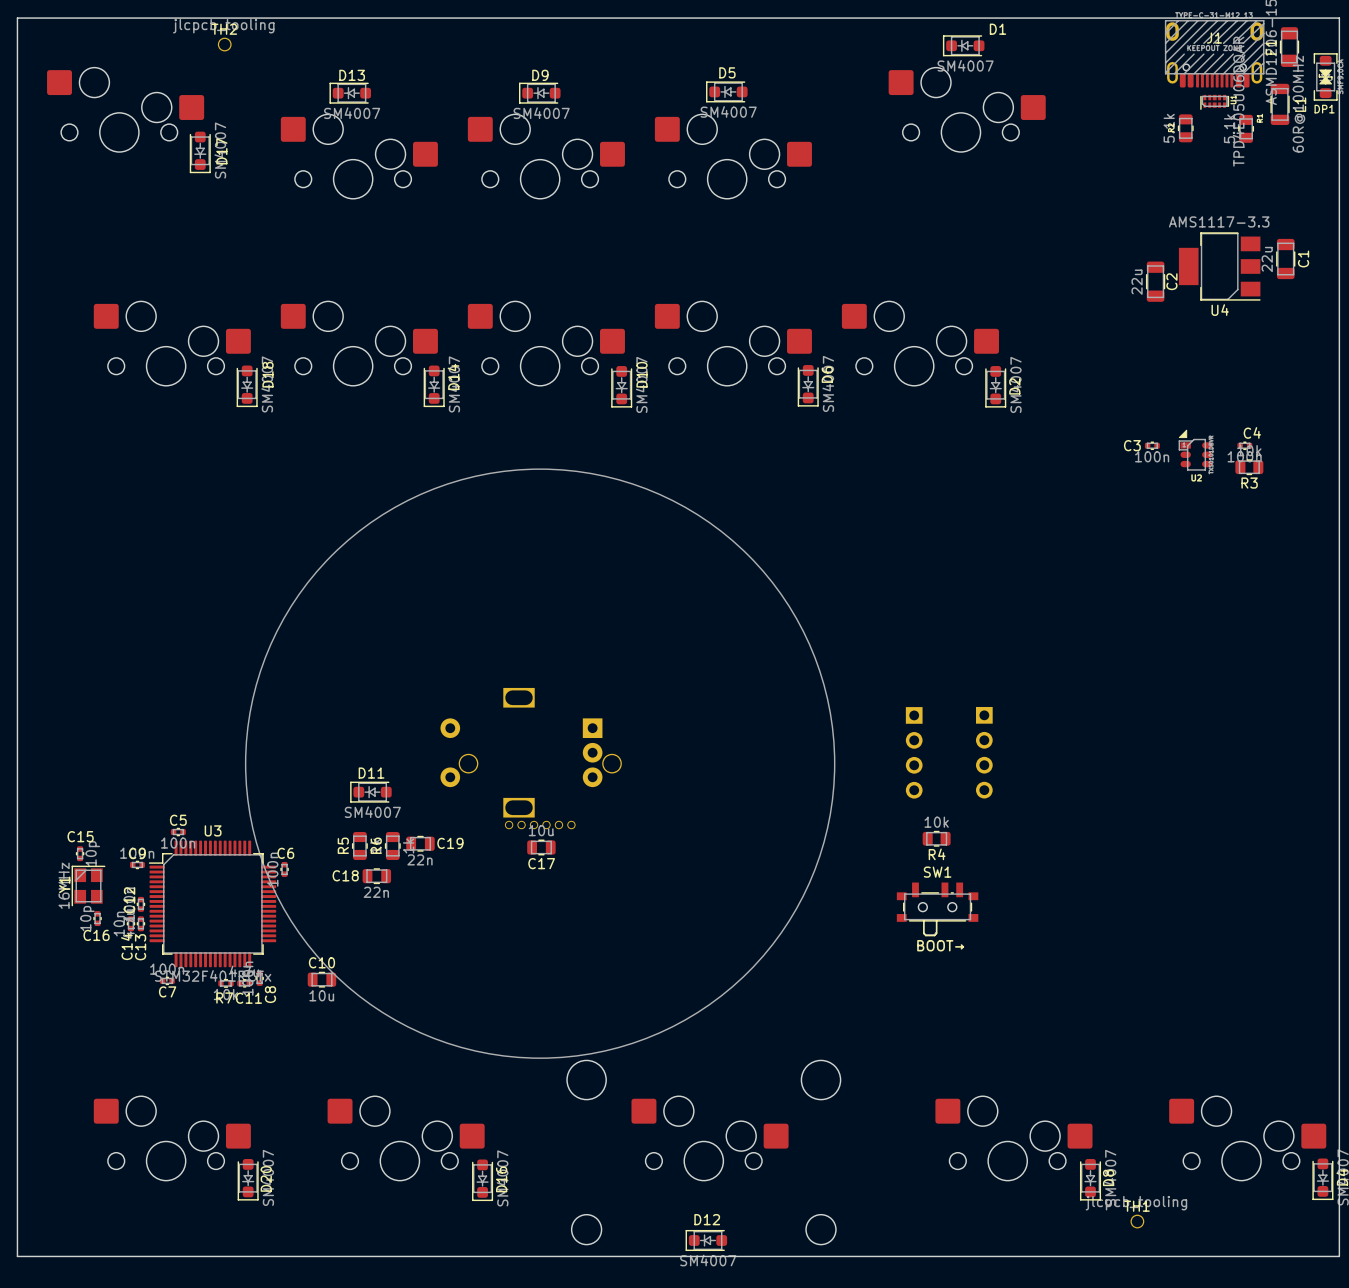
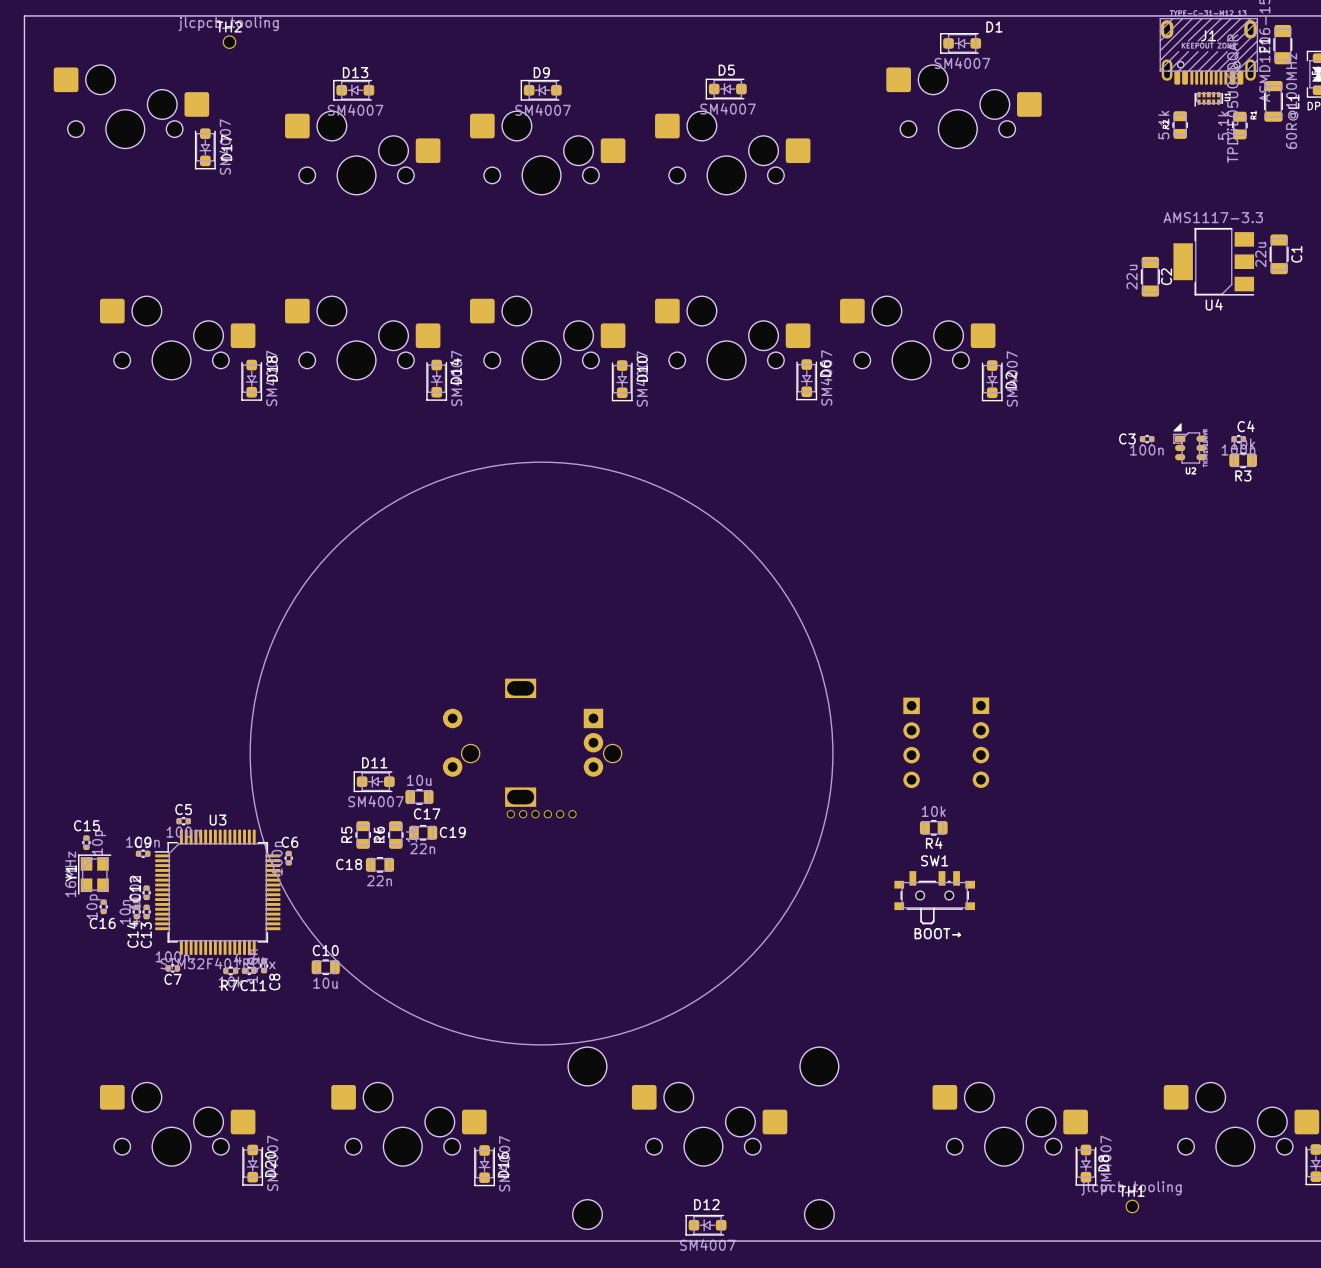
C17 position: (541, 847) -> (419, 797)
C17 name position: C17 (541, 863) -> C17 (427, 813)

